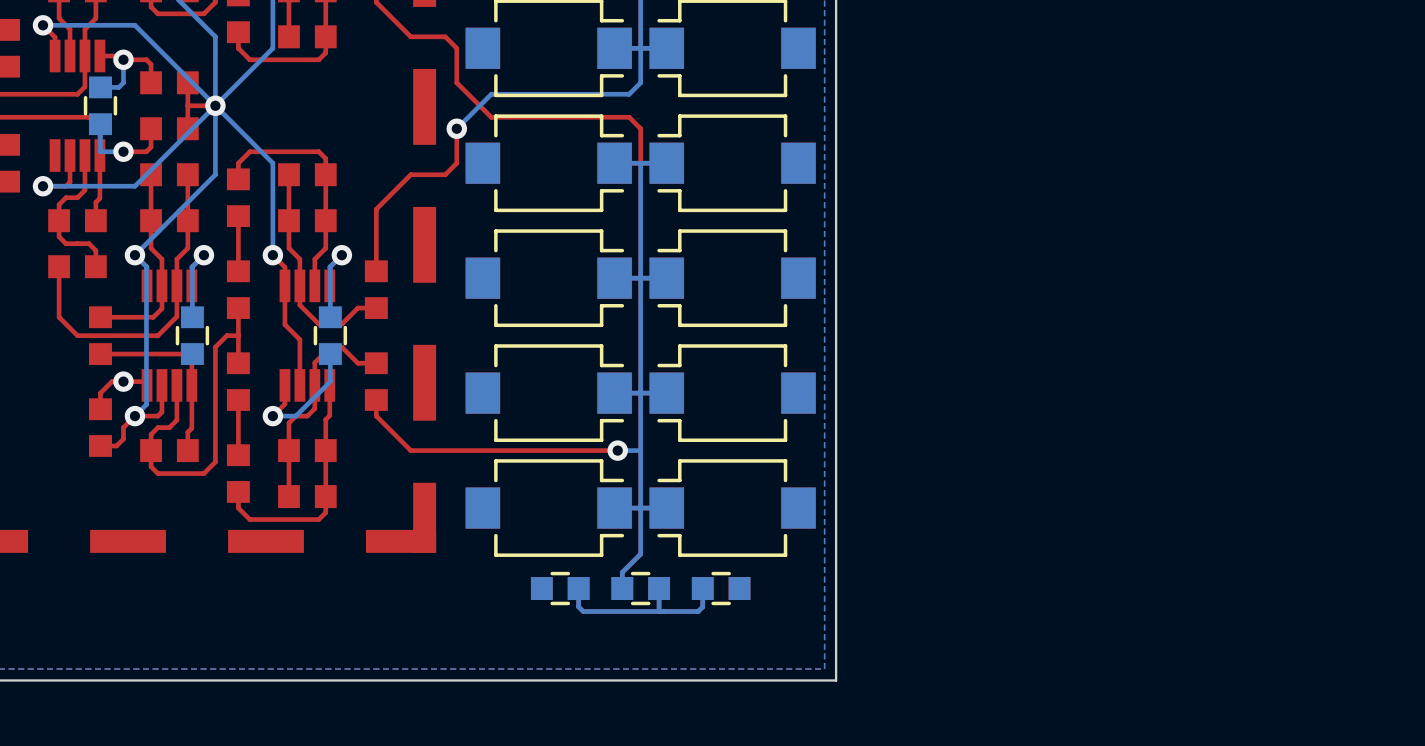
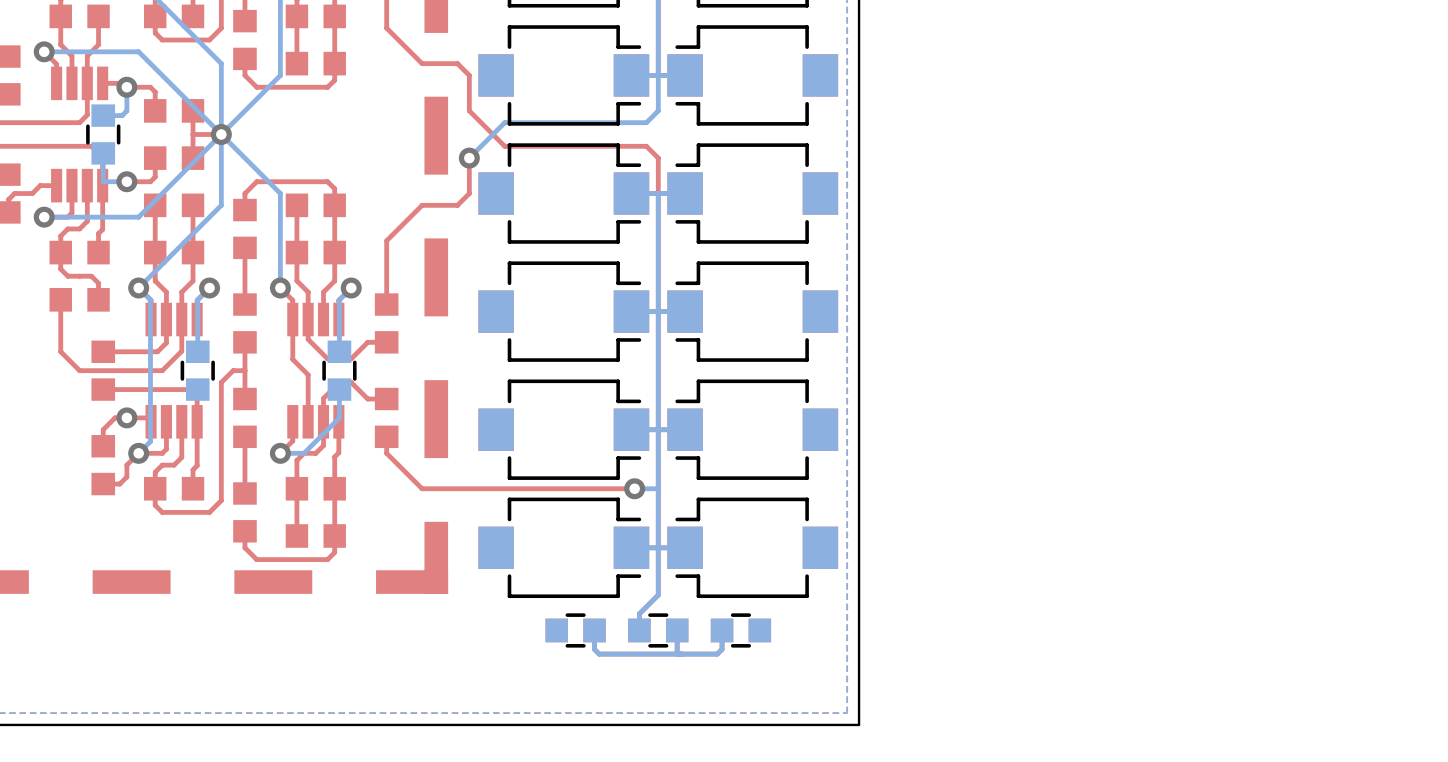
top track: none -> (56, 185) (40, 185) (32, 193) (14, 193) (8, 199) (8, 212)

